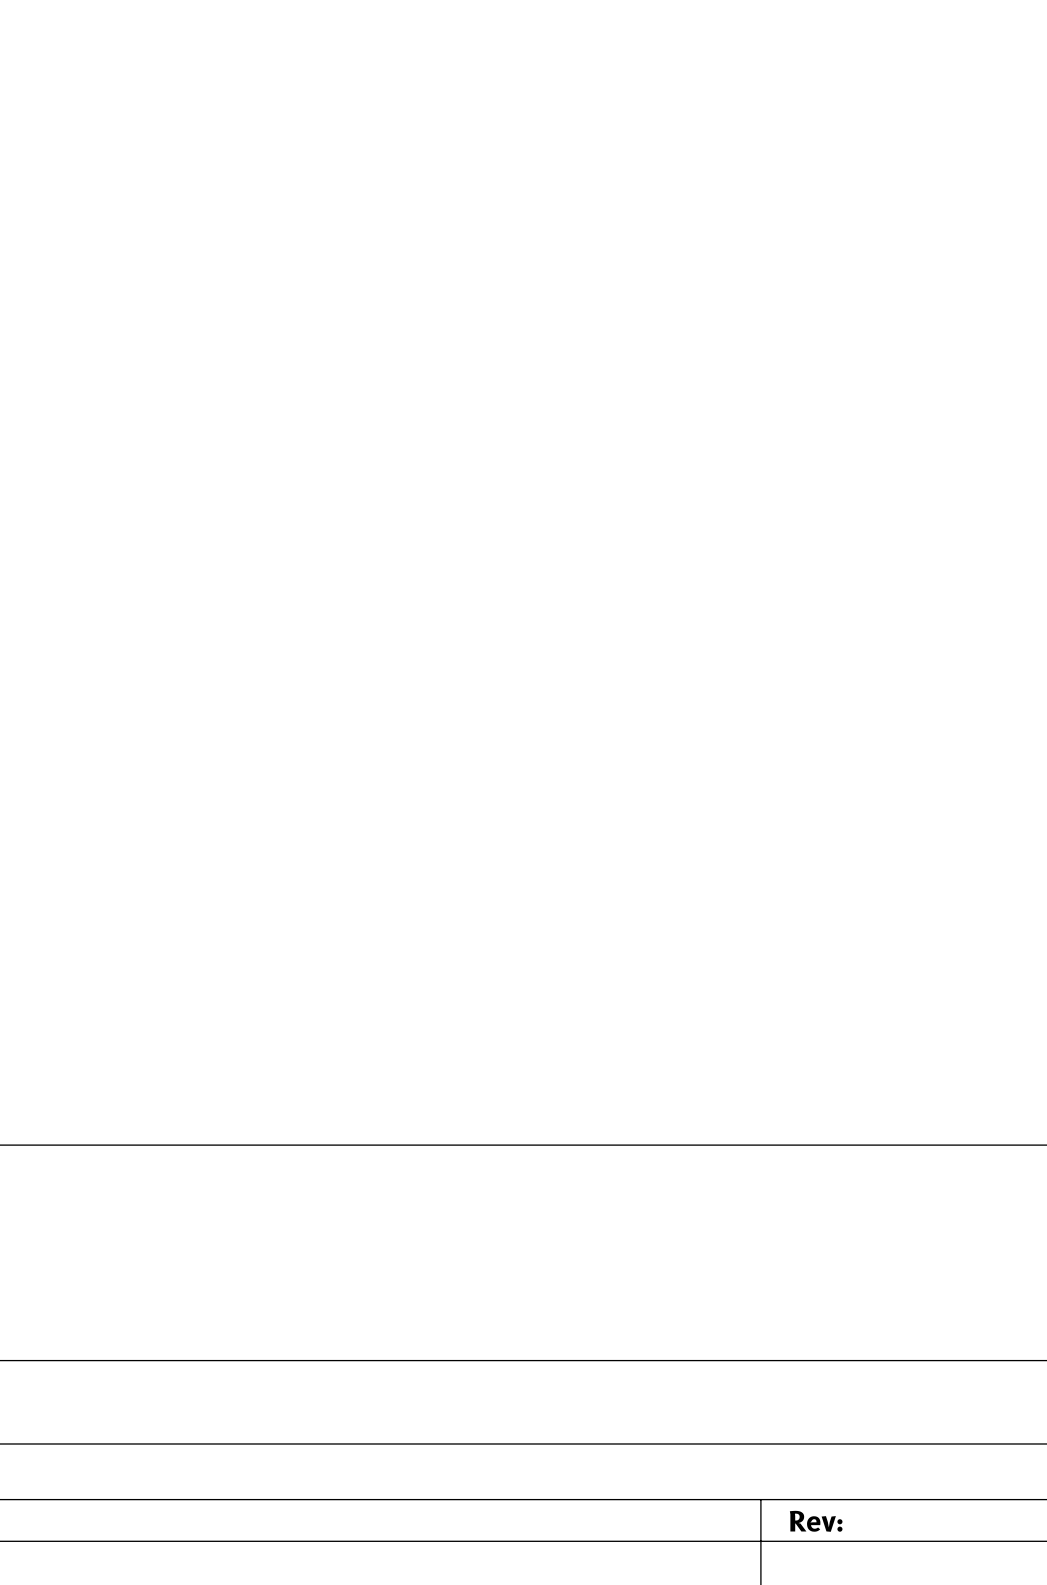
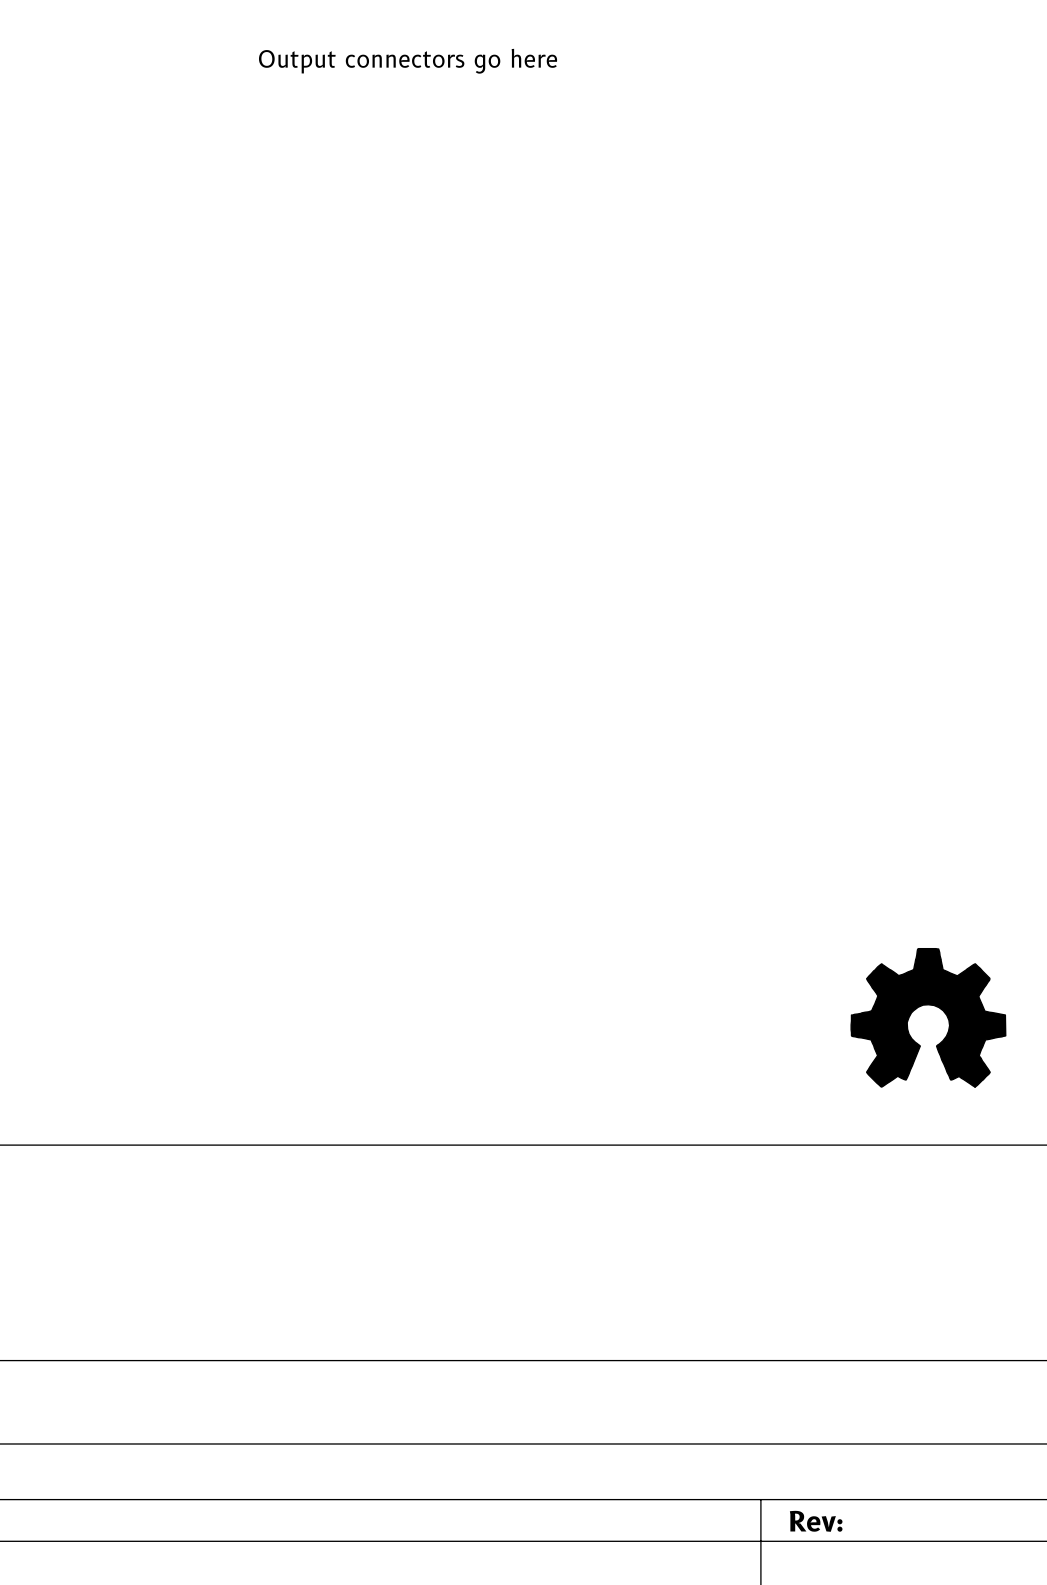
text: none -> Output connectors go here (408, 61)
part: none -> (928, 1017)

